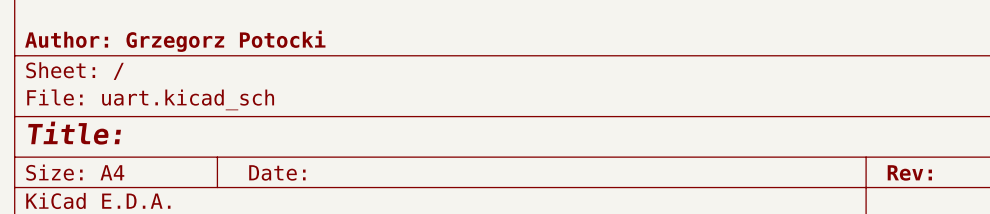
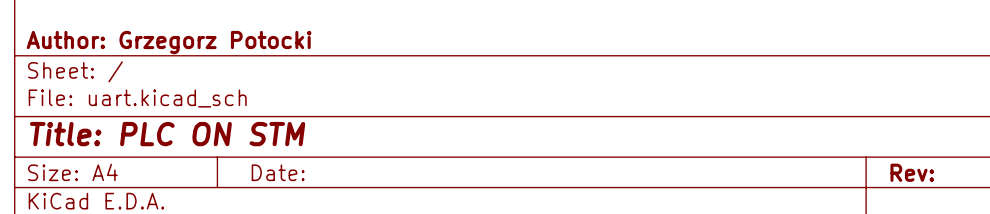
title block: Title: (74, 133) -> Title: PLC ON STM (167, 134)

